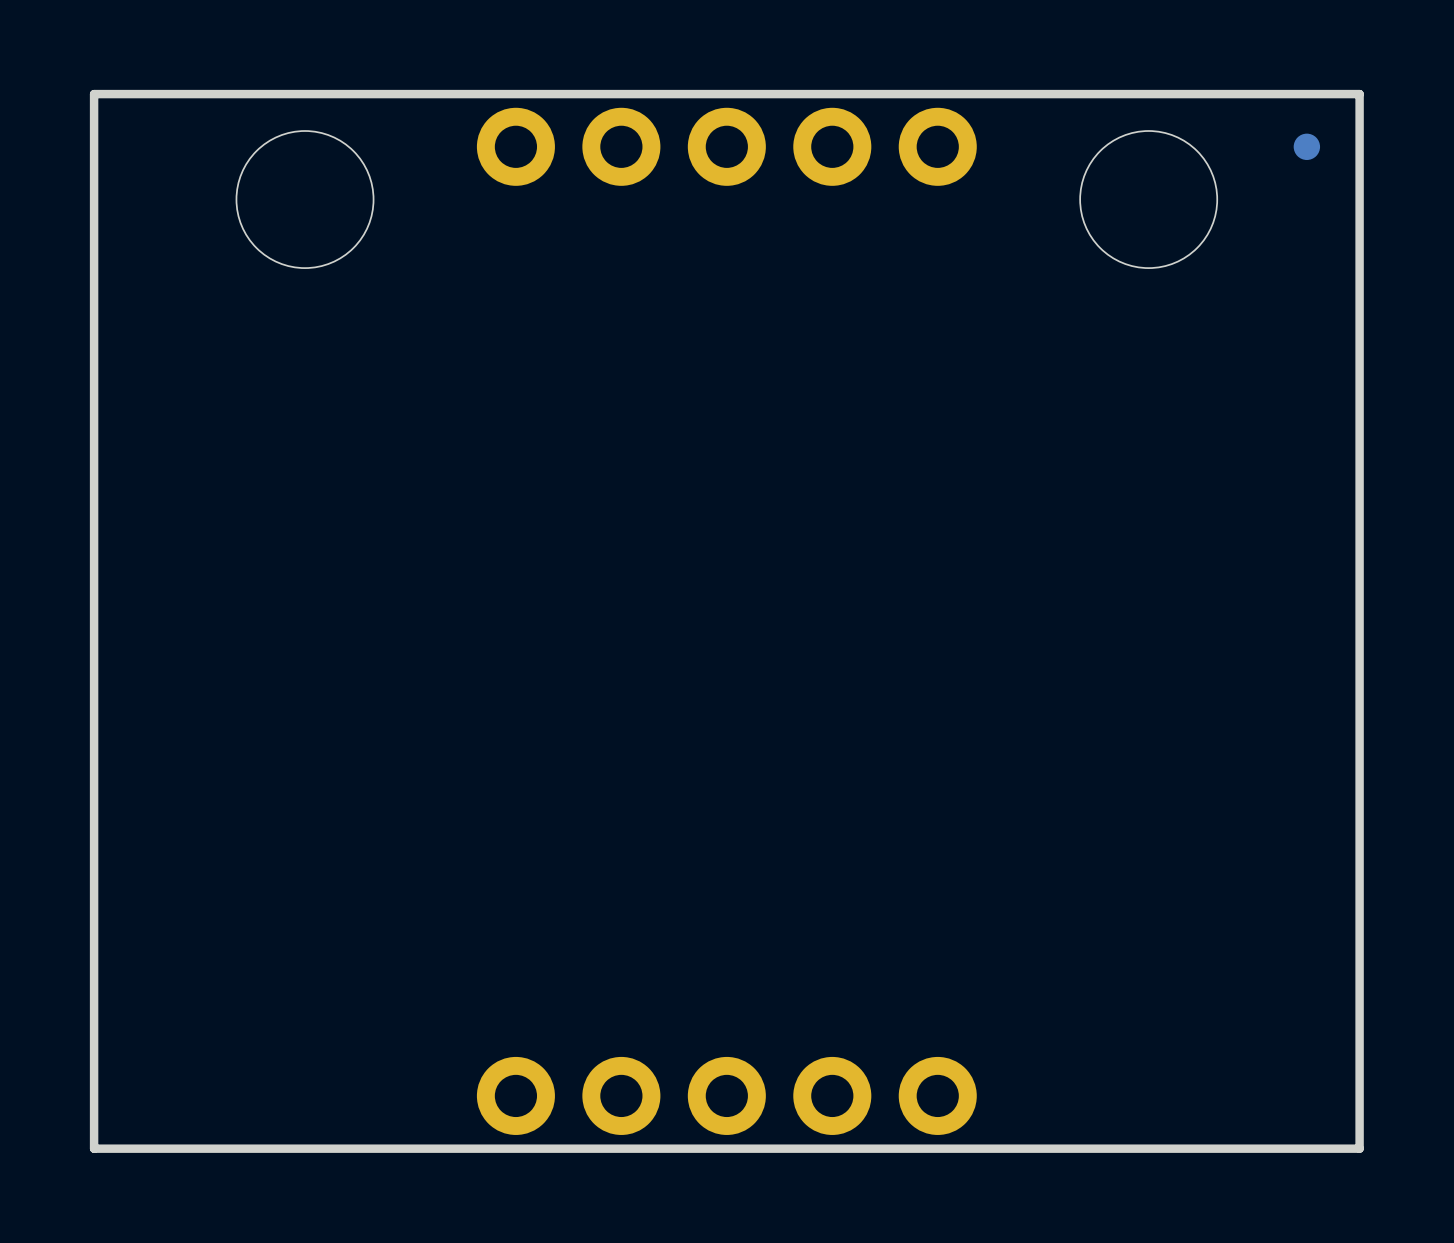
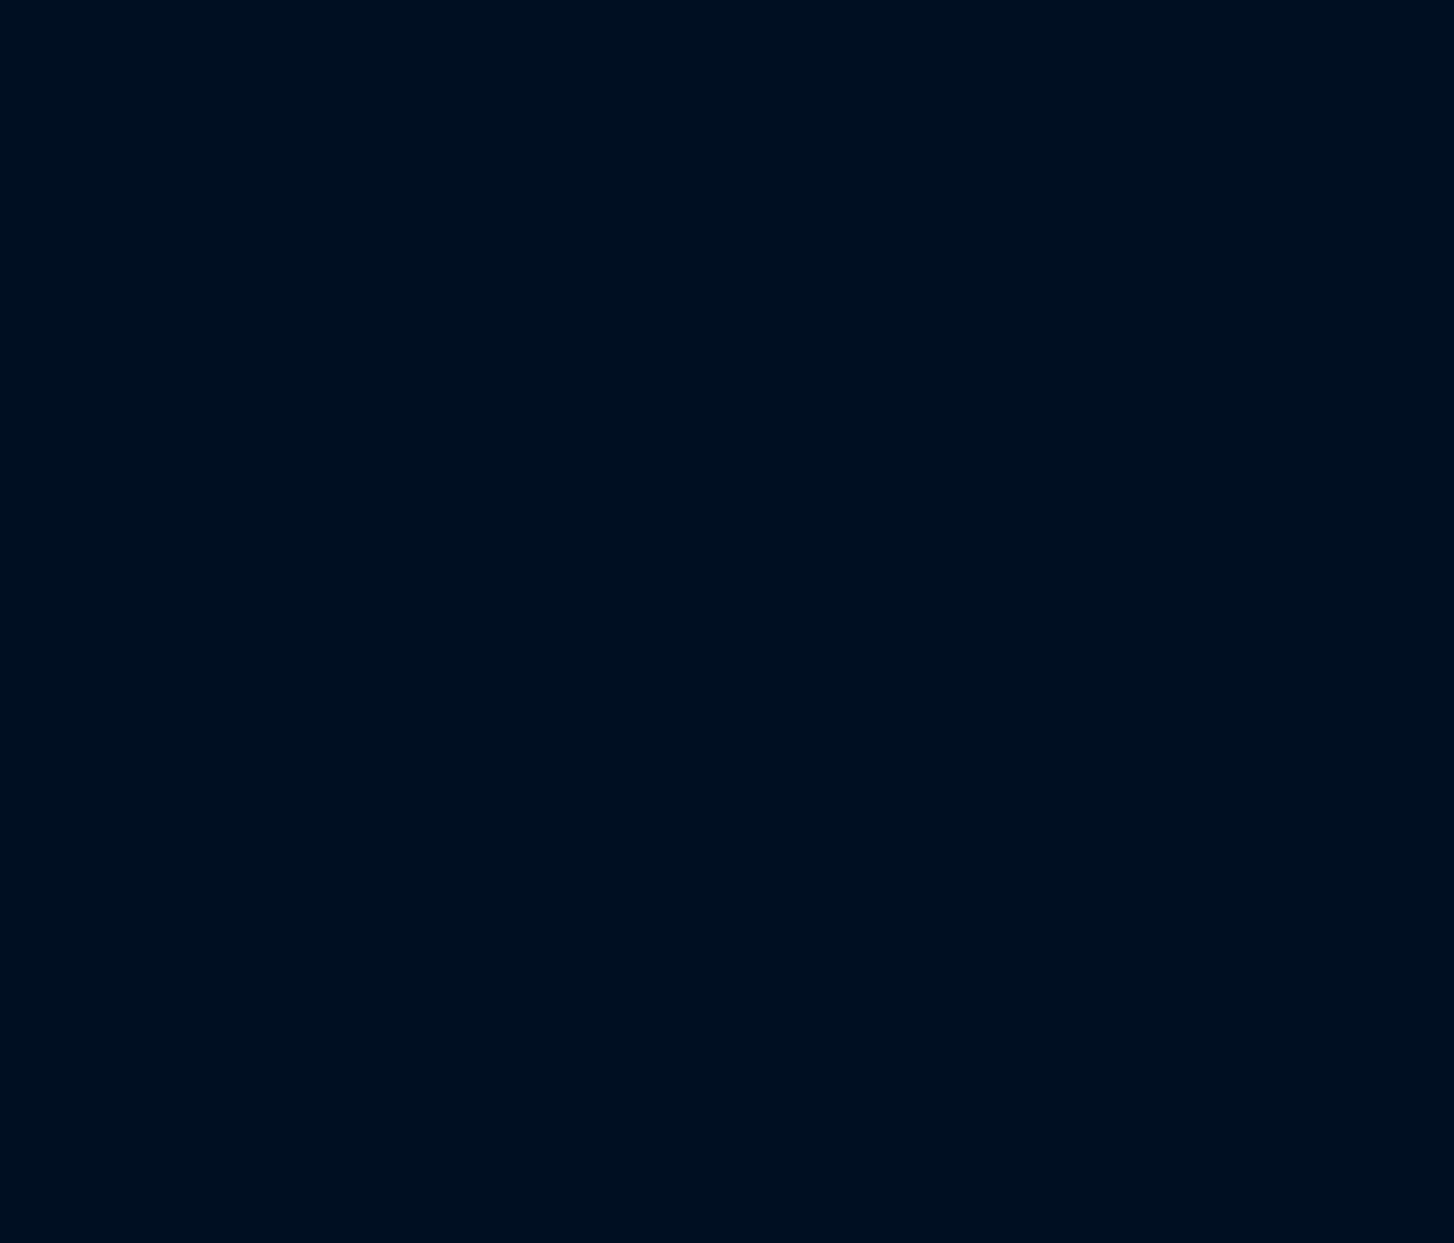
part: (726, 621) -> none

